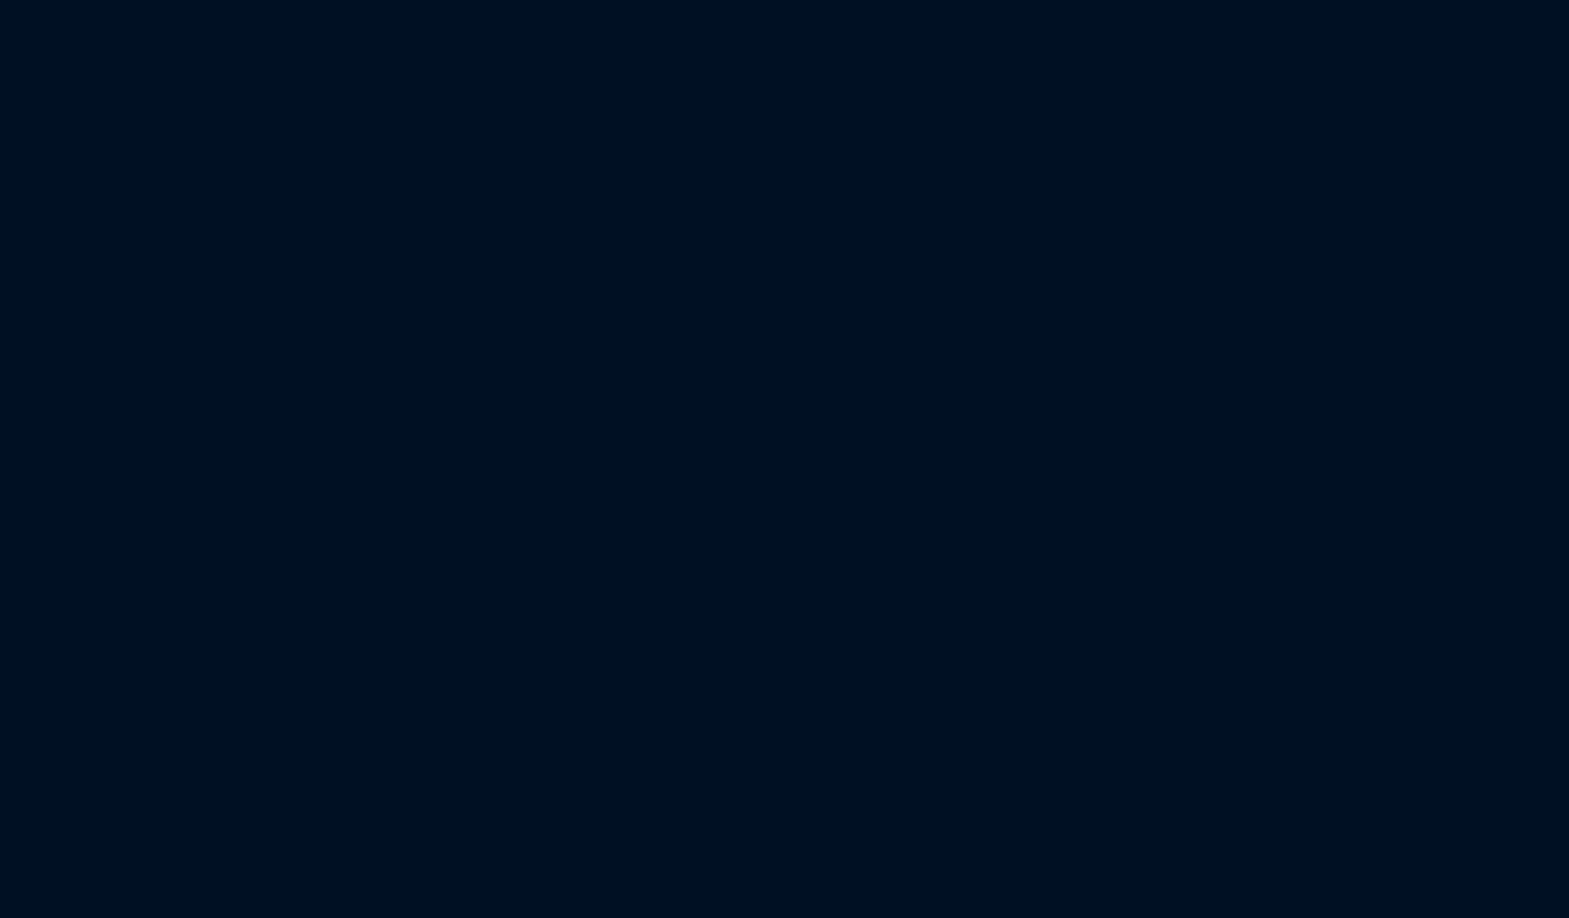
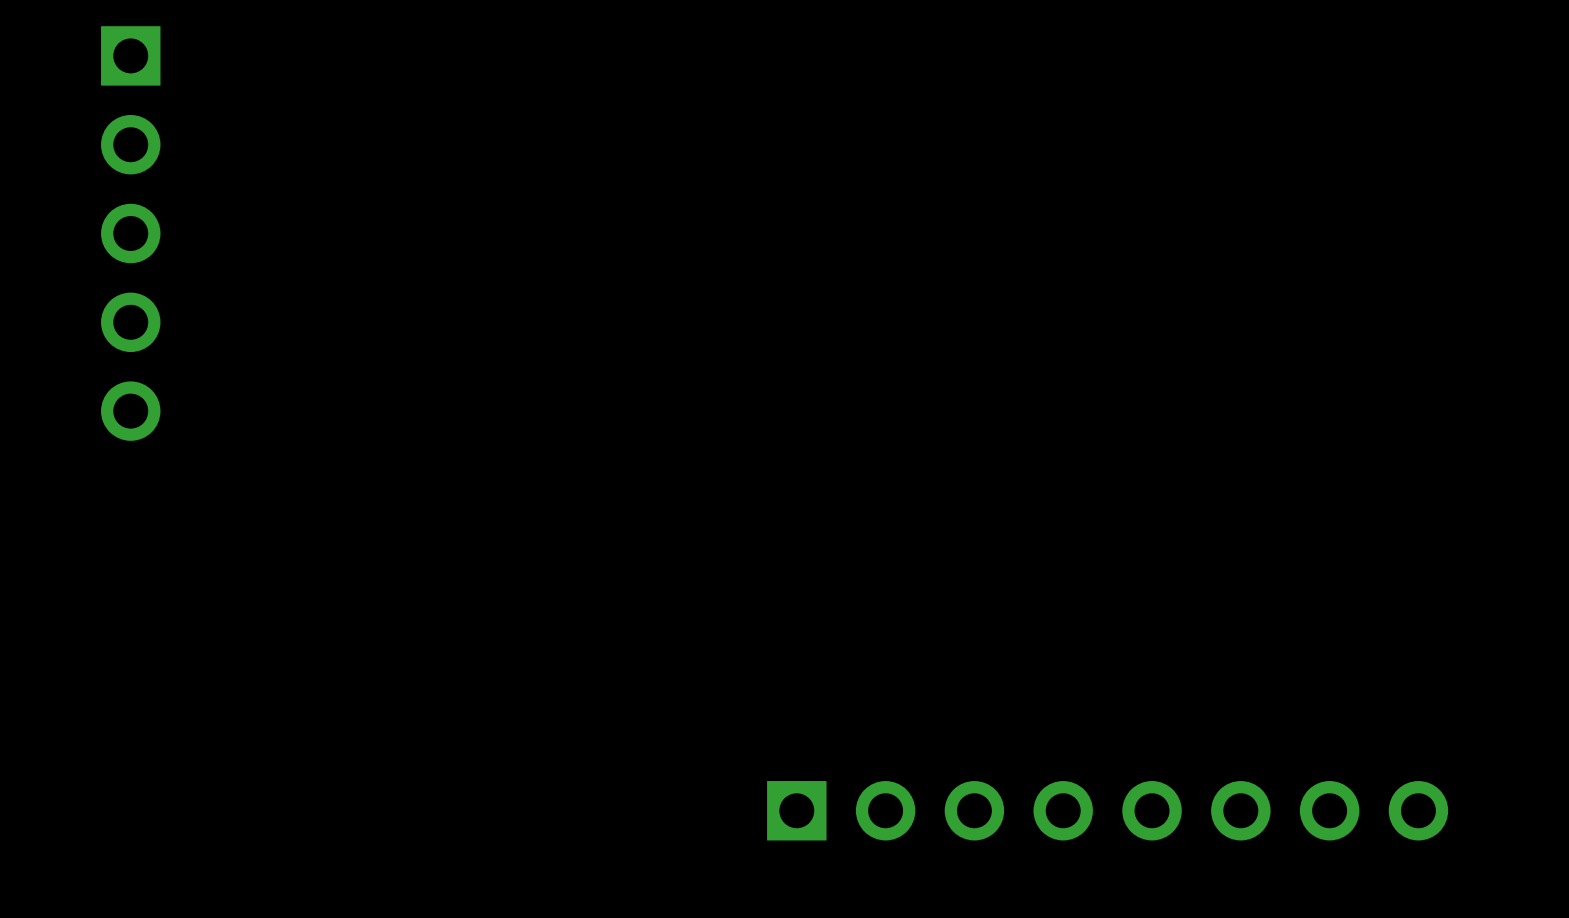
part: none -> (130, 233)
part: none -> (1107, 810)

